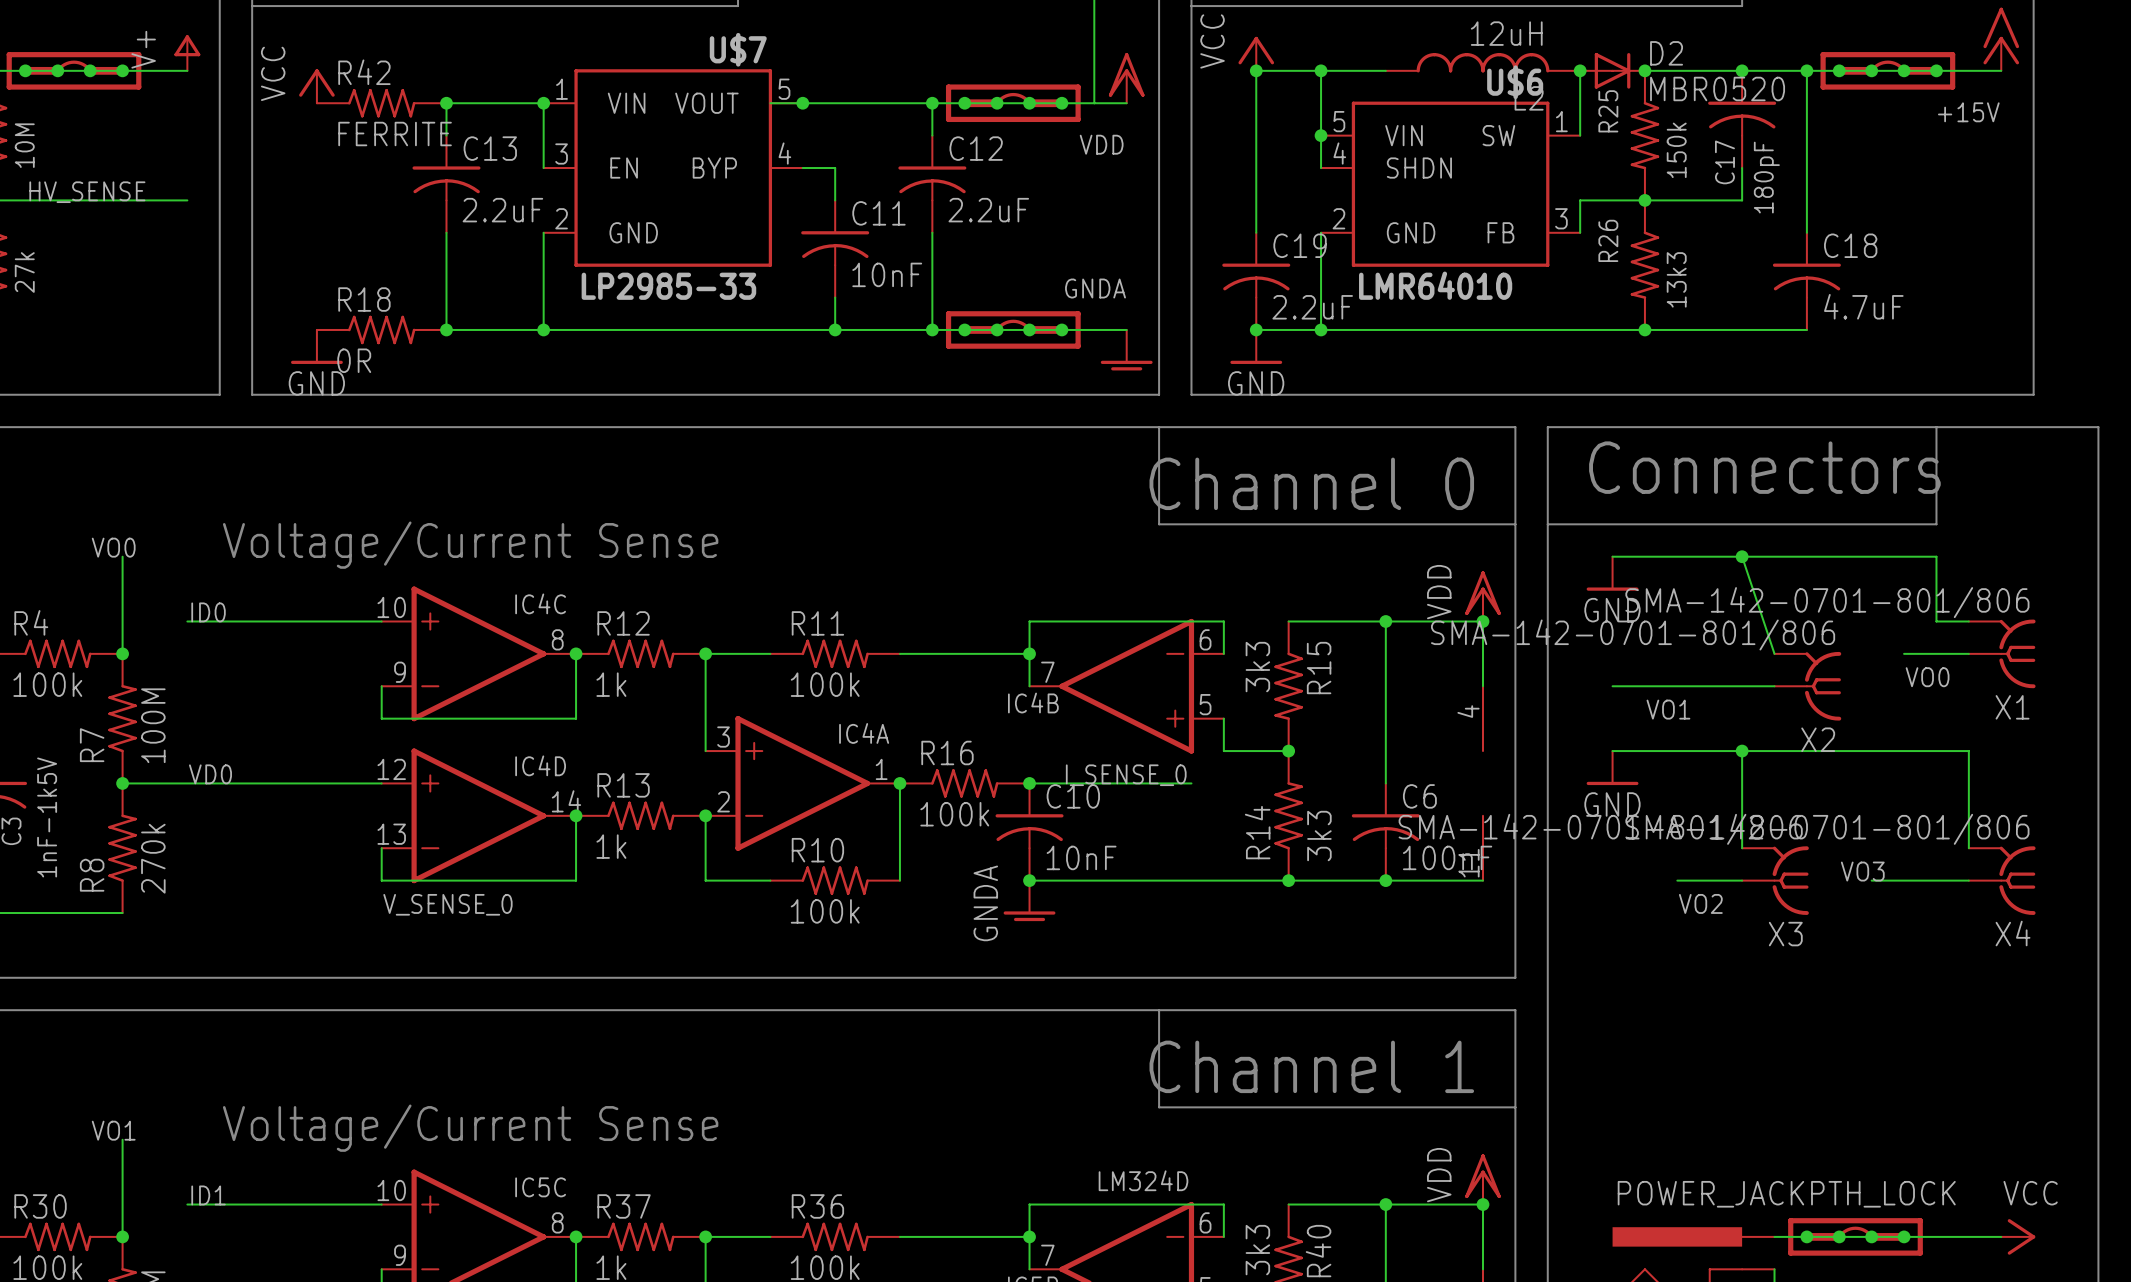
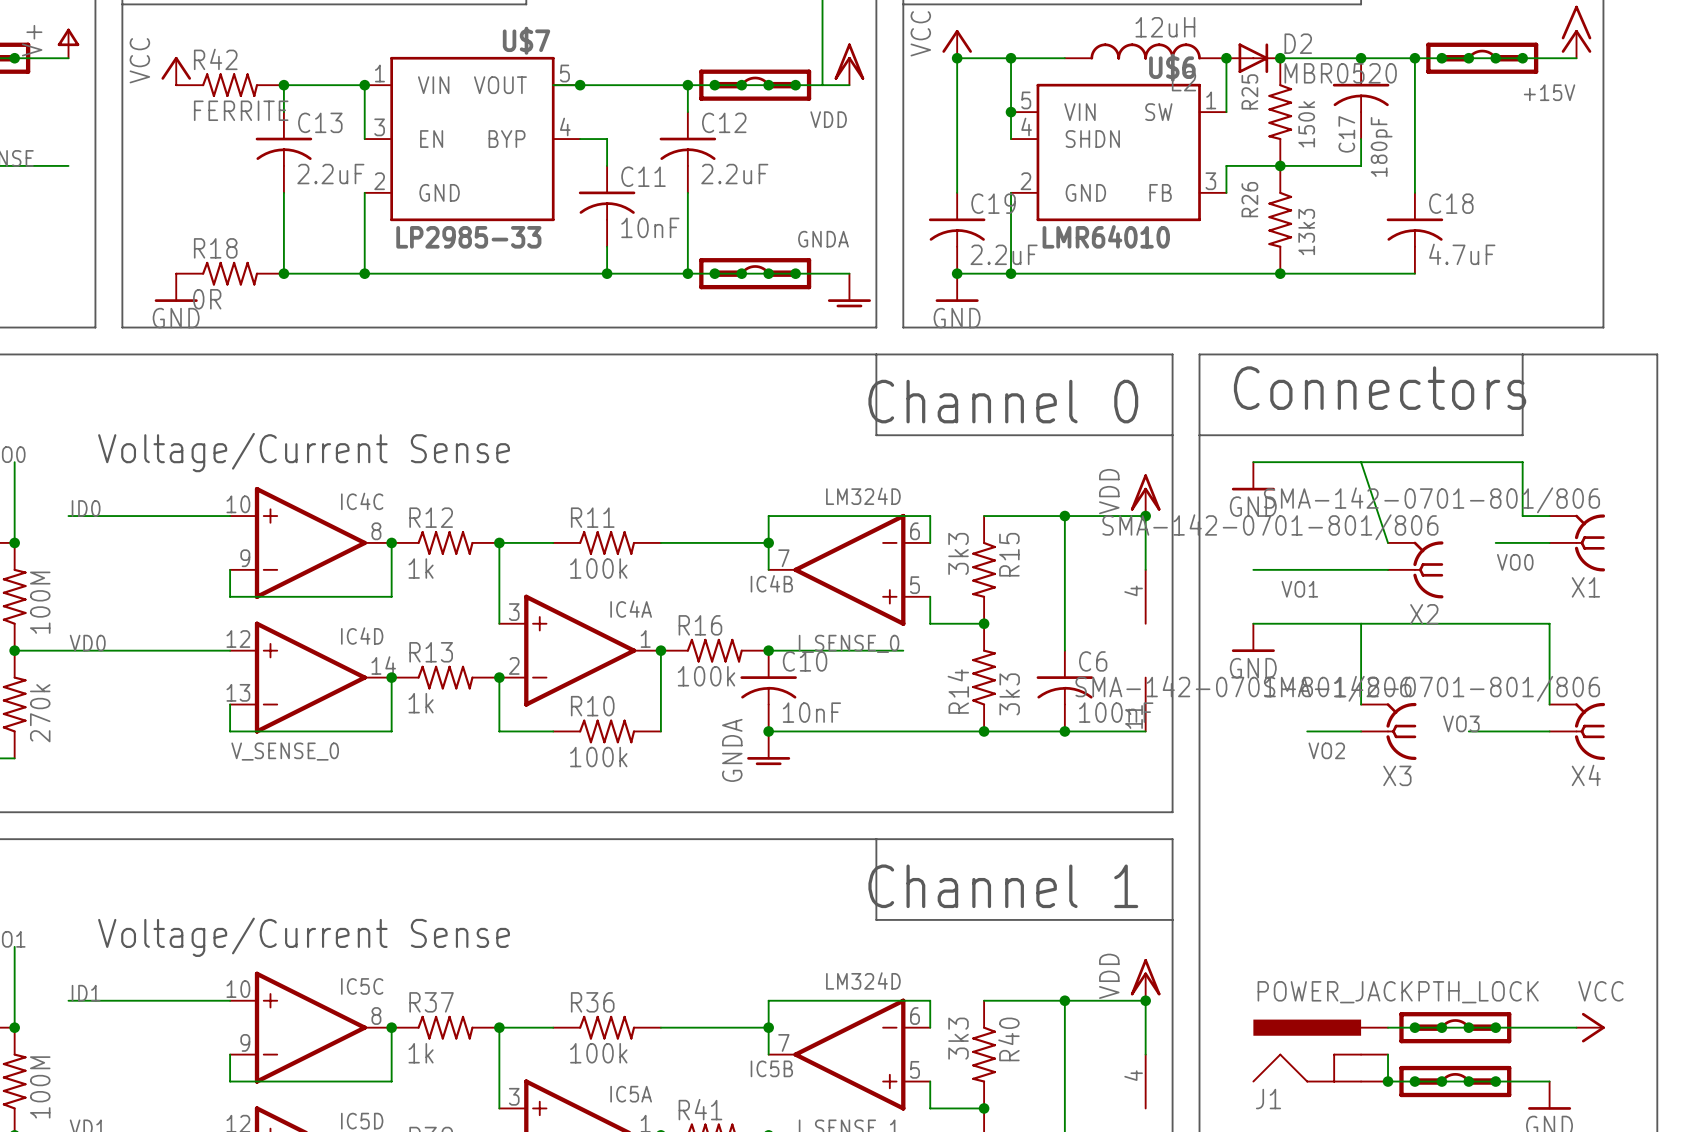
junction: (1742, 556) -> none
IC4B value: none -> LM324D (863, 496)
junction: (1742, 751) -> none

